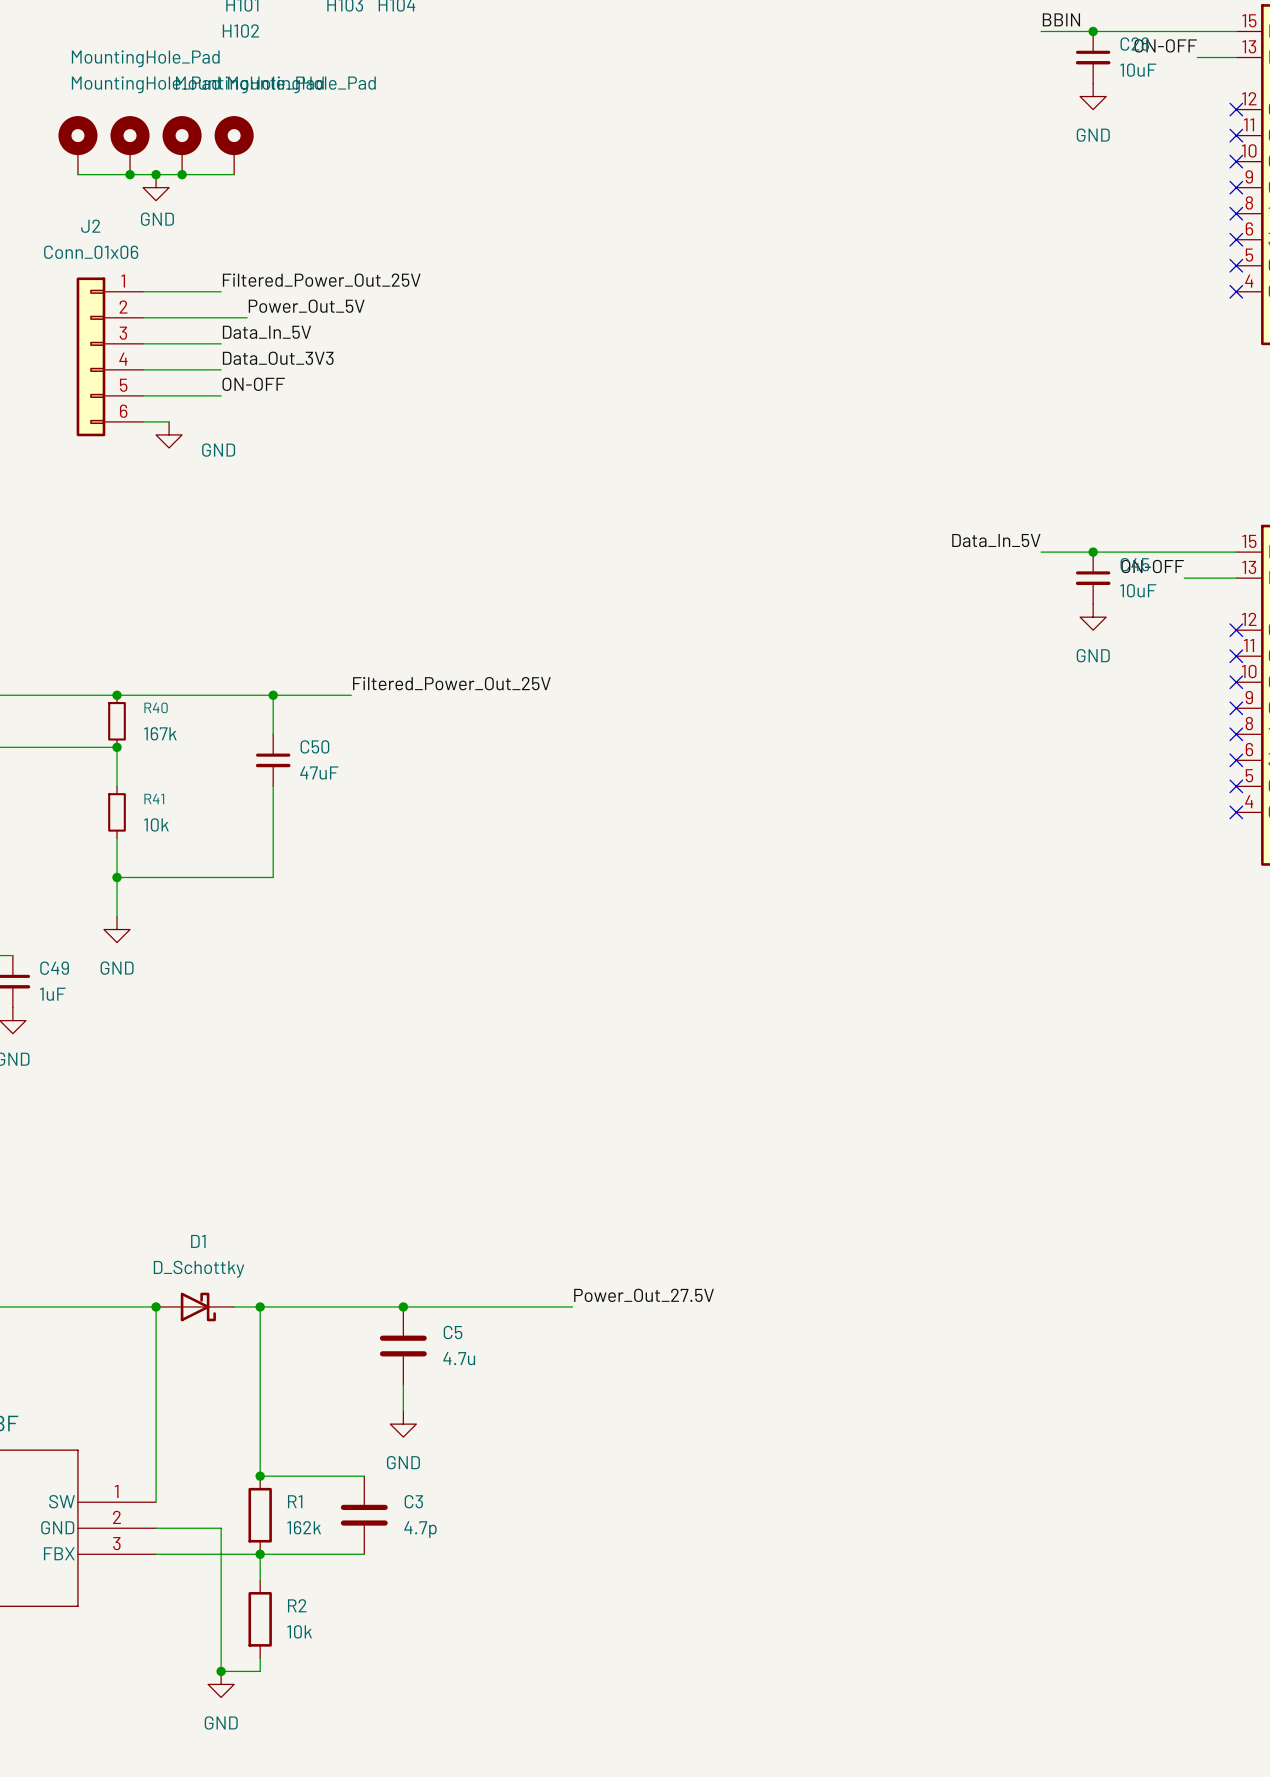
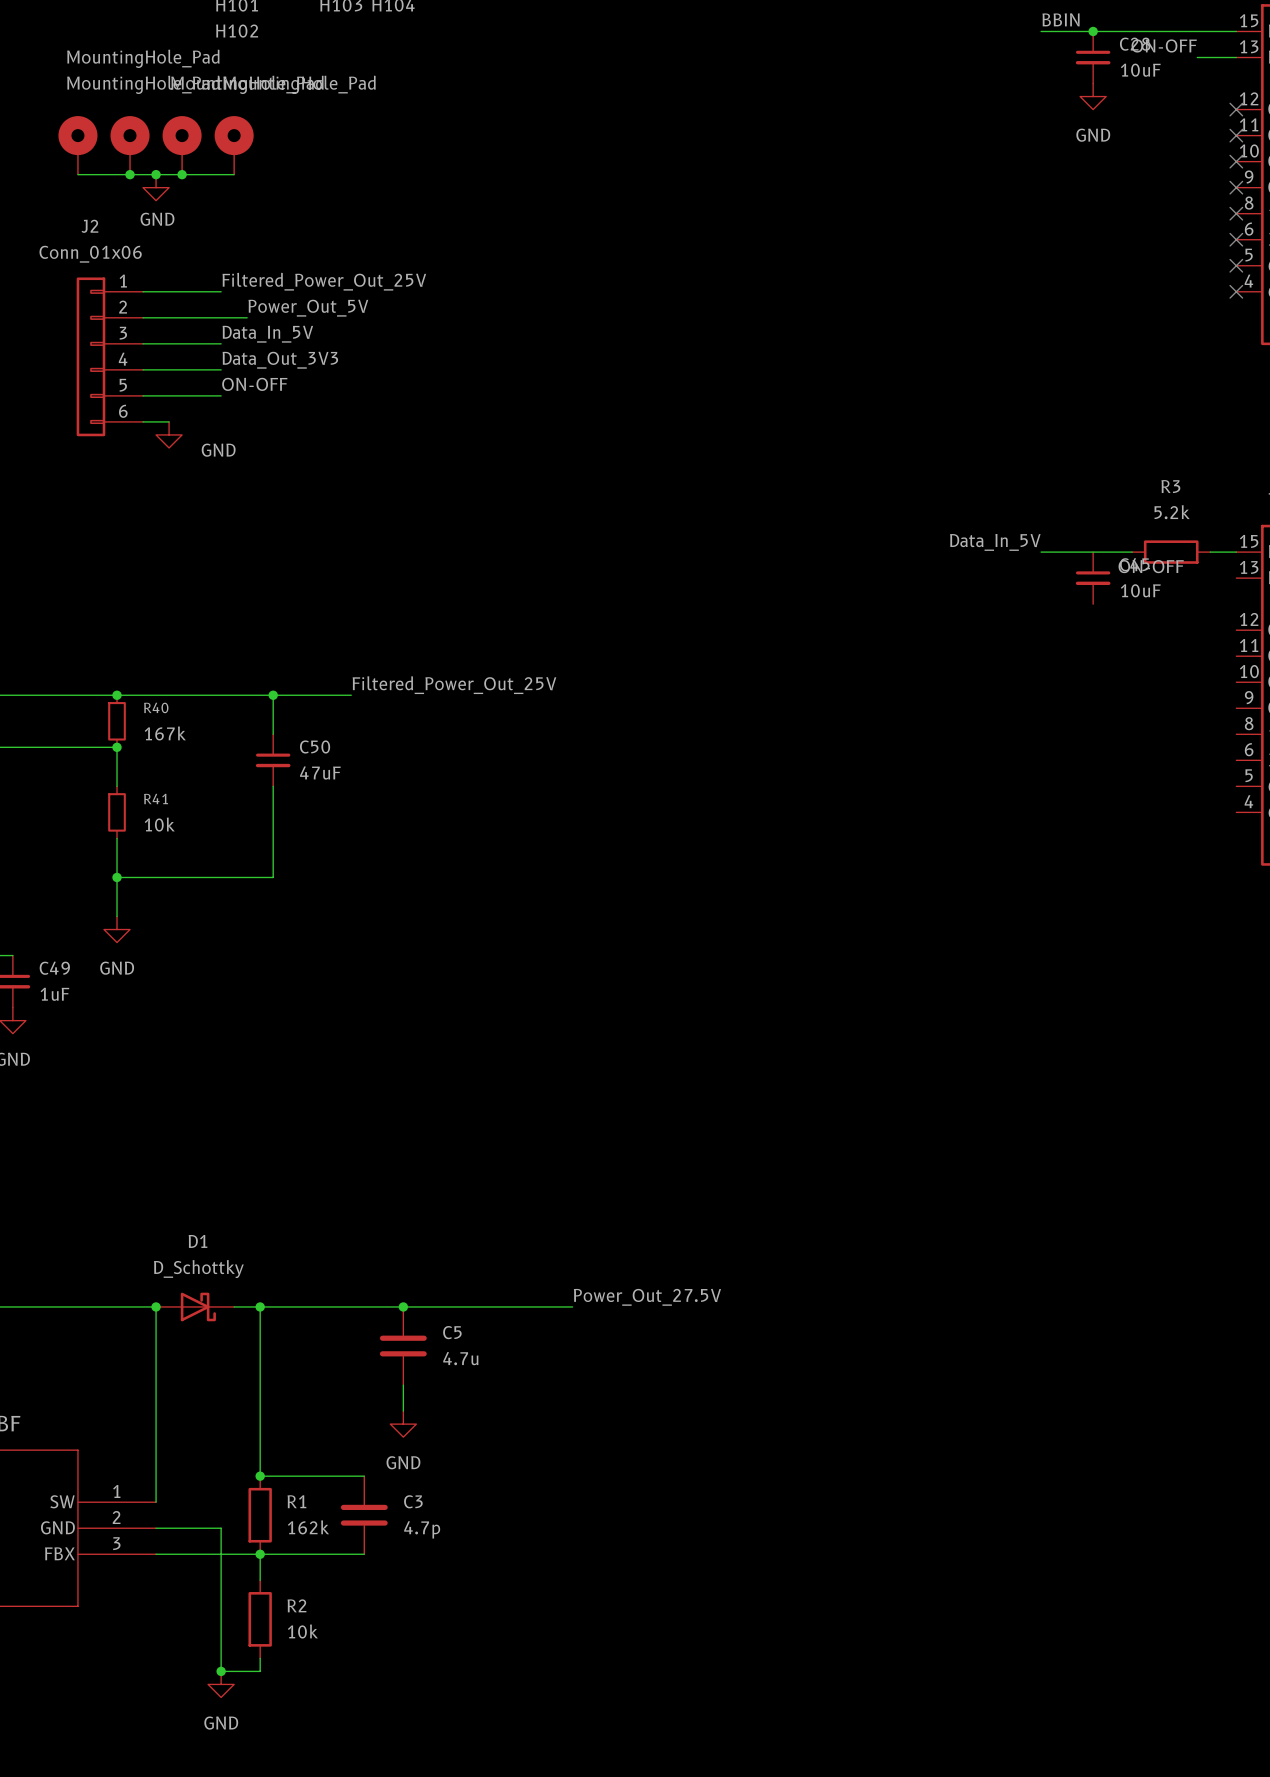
junction: (1093, 552) -> none
wire: (1132, 552) (1210, 552) -> none
R3: none -> 5.2k (1171, 552)
wire: (1184, 578) (1236, 578) -> none
power symbol: GND (1093, 617) -> none
no-connect mark: (1236, 630) -> none
no-connect mark: (1236, 656) -> none
no-connect mark: (1236, 682) -> none
no-connect mark: (1236, 708) -> none
no-connect mark: (1236, 734) -> none
no-connect mark: (1236, 760) -> none
no-connect mark: (1236, 786) -> none
no-connect mark: (1236, 812) -> none

